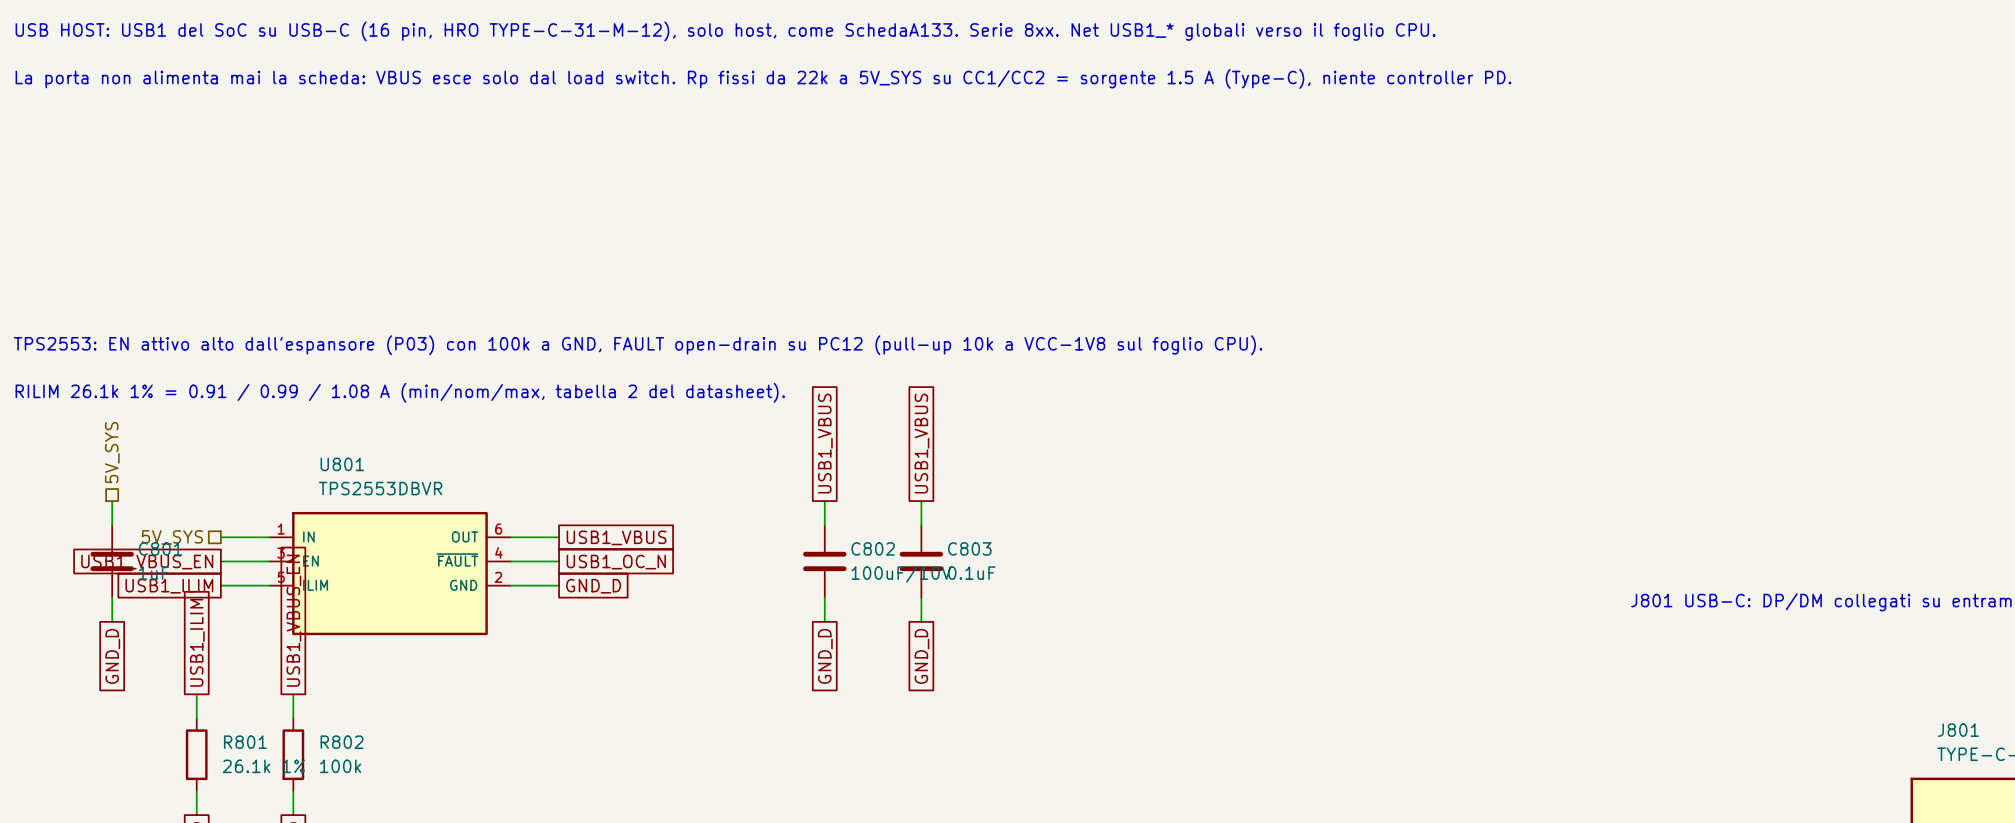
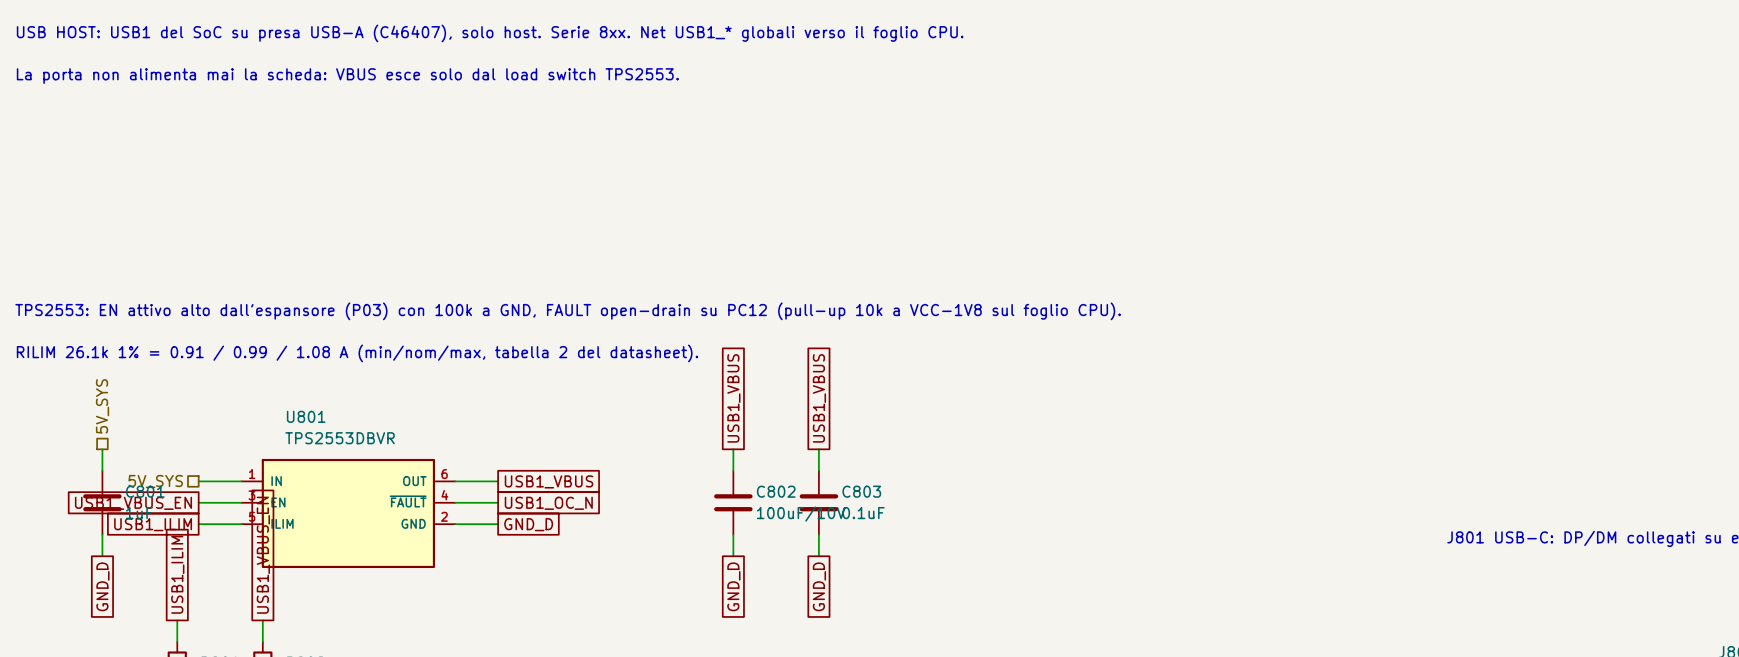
text: USB HOST: USB1 del SoC su USB-C (16 pin, HRO TYPE-C-31-M-12), solo host, come SchedaA133. Serie 8xx. Net USB1_* globali verso il foglio CPU. (725, 31) -> USB HOST: USB1 del SoC su presa USB-A (C46407), solo host. Serie 8xx. Net USB1_* globali verso il foglio CPU. (490, 33)
text: La porta non alimenta mai la scheda: VBUS esce solo dal load switch. Rp fissi da 22k a 5V_SYS su CC1/CC2 = sorgente 1.5 A (Type-C), niente controller PD. (763, 78) -> La porta non alimenta mai la scheda: VBUS esce solo dal load switch TPS2553. (347, 76)

